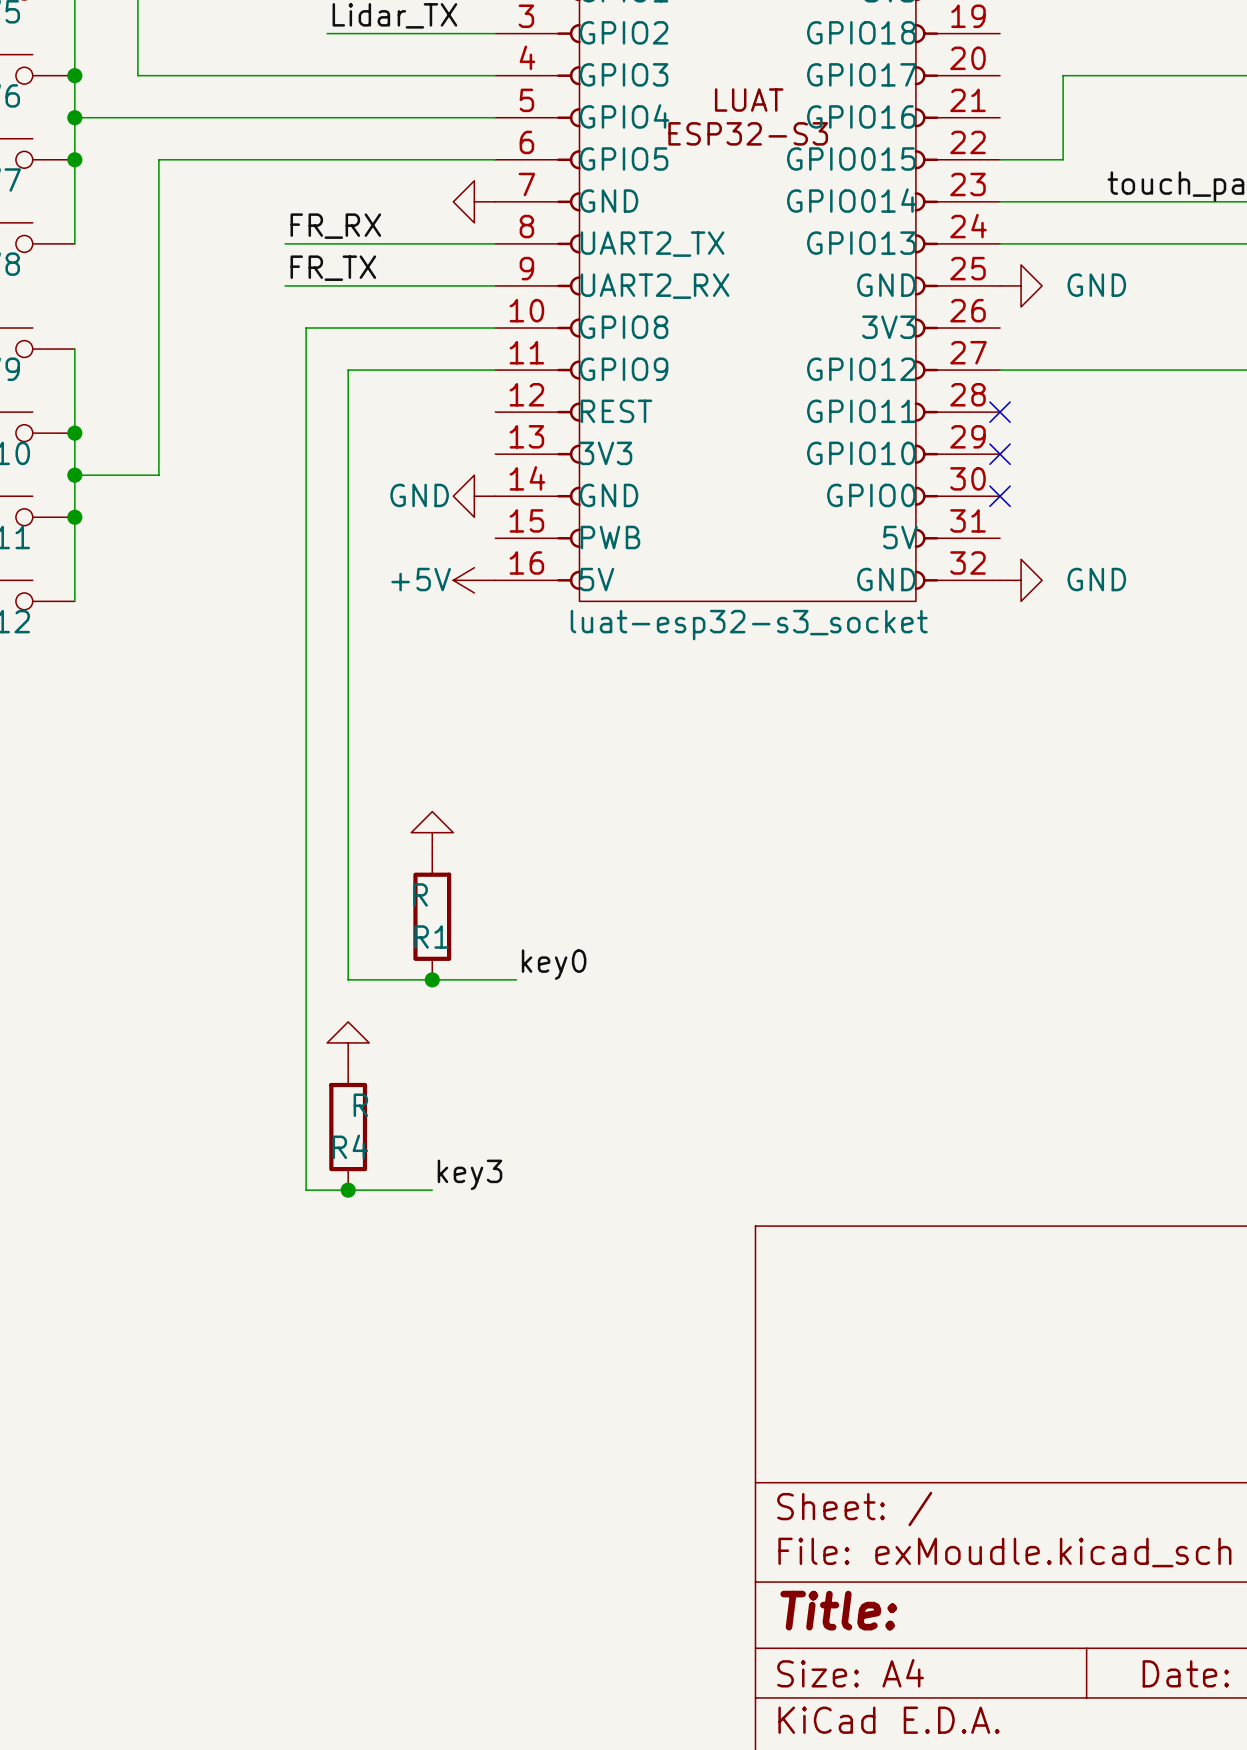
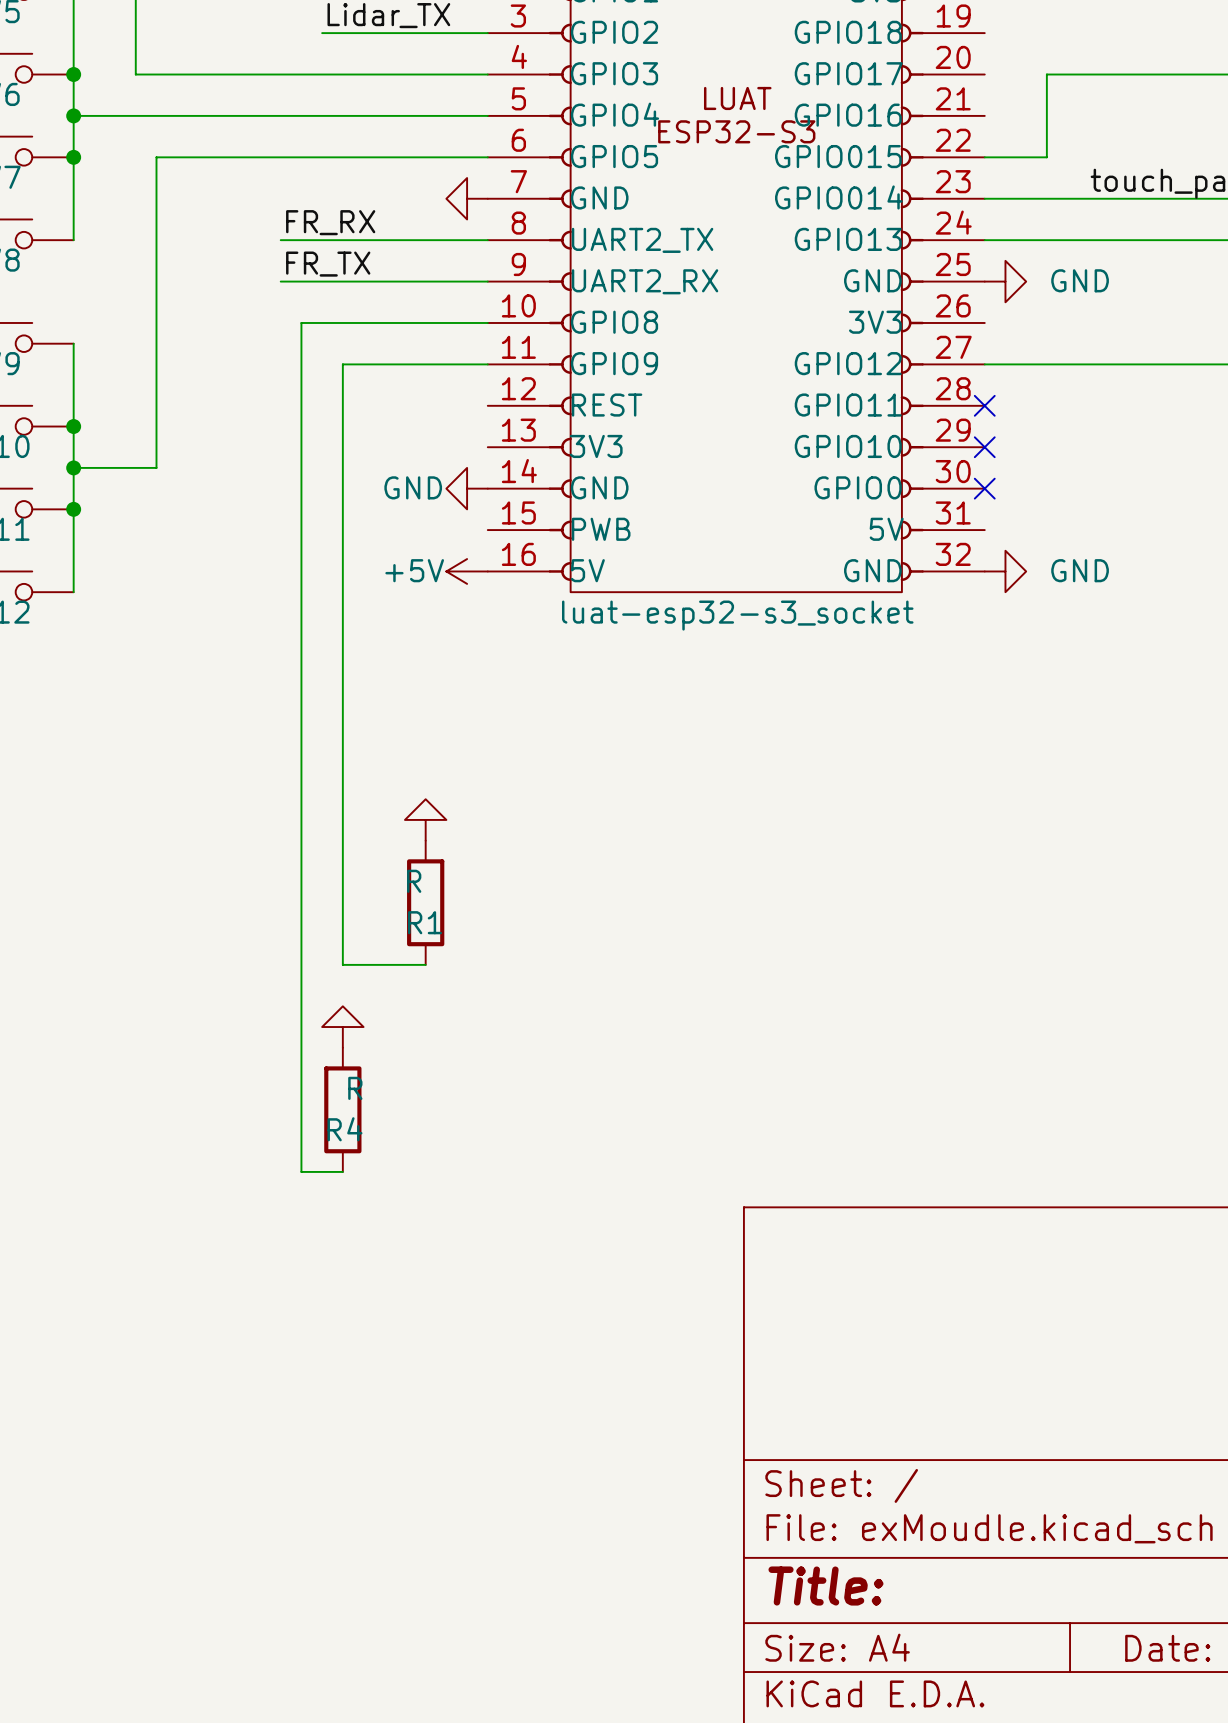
label: key0 (554, 964) -> none
wire: (432, 979) (516, 979) -> none
junction: (432, 979) -> none
label: key3 (469, 1174) -> none
wire: (348, 1190) (432, 1190) -> none
junction: (348, 1190) -> none

